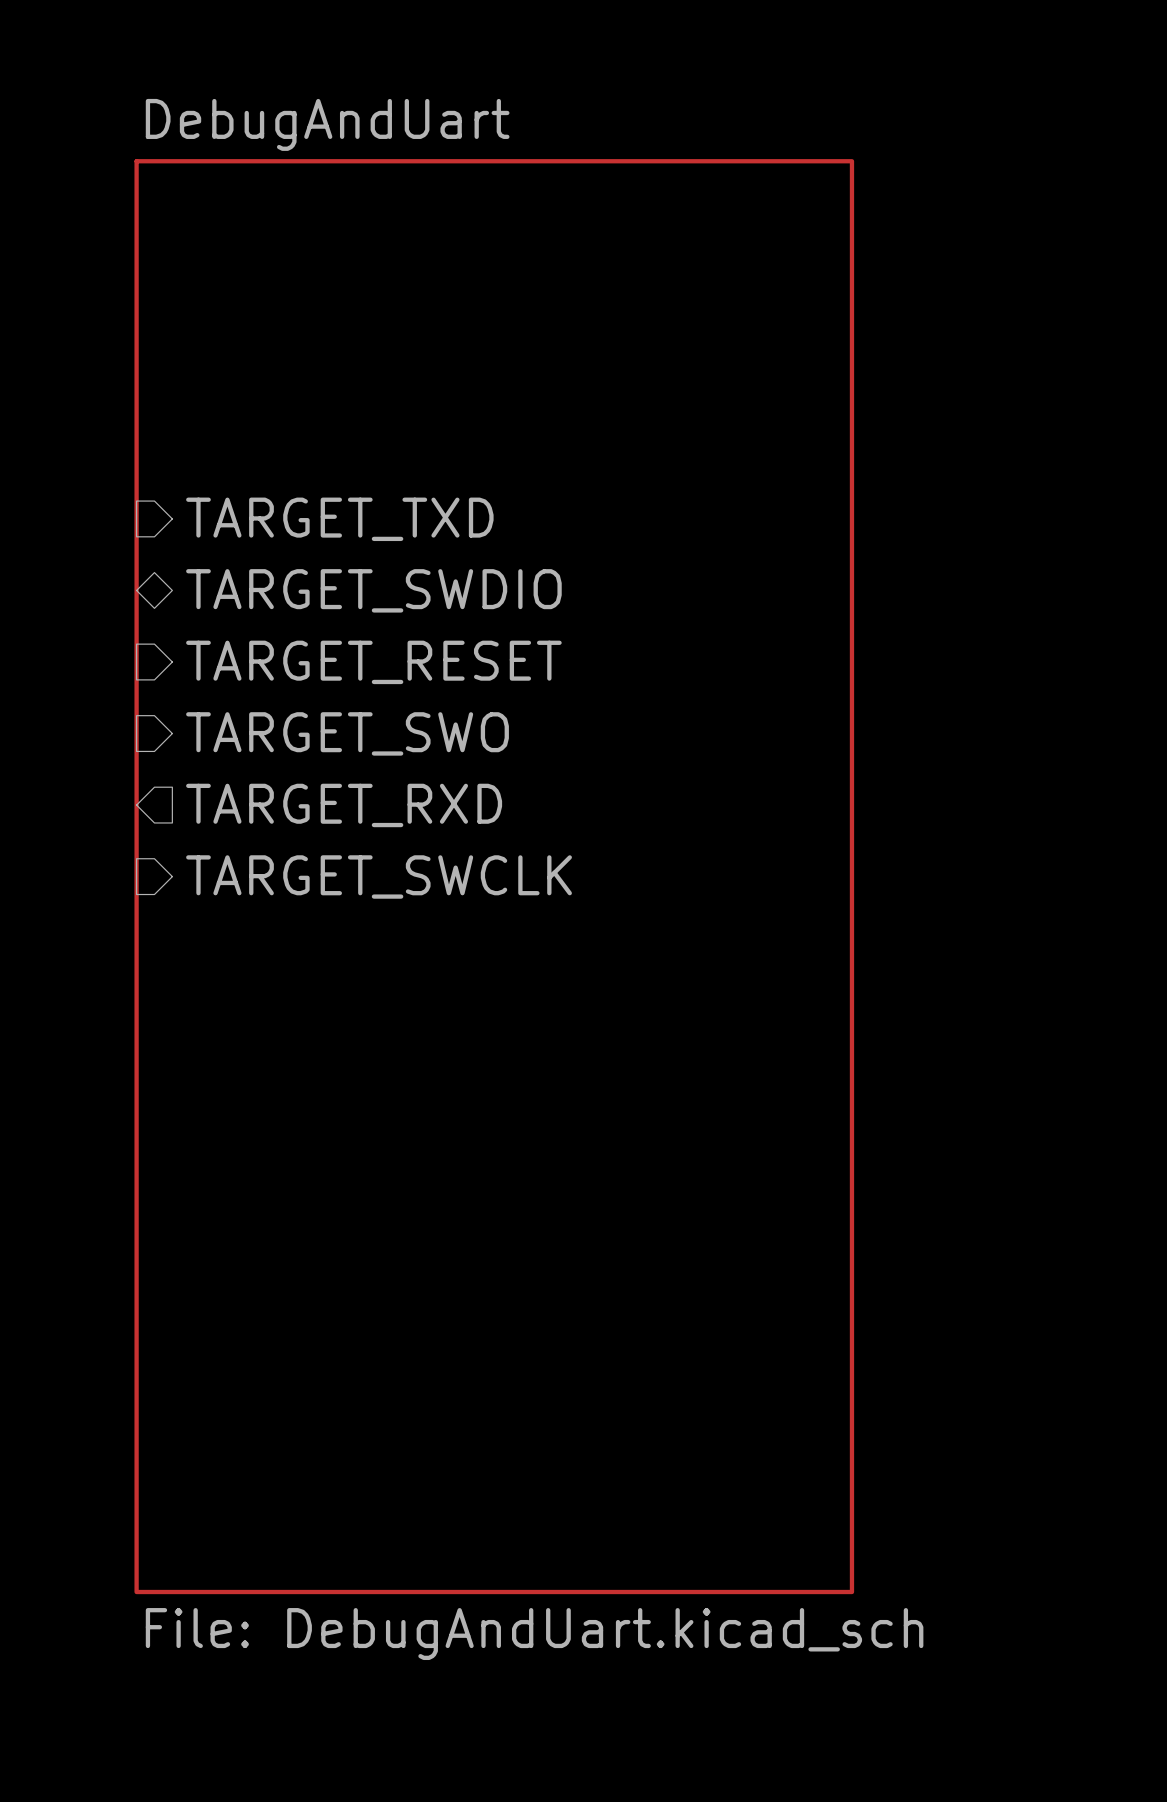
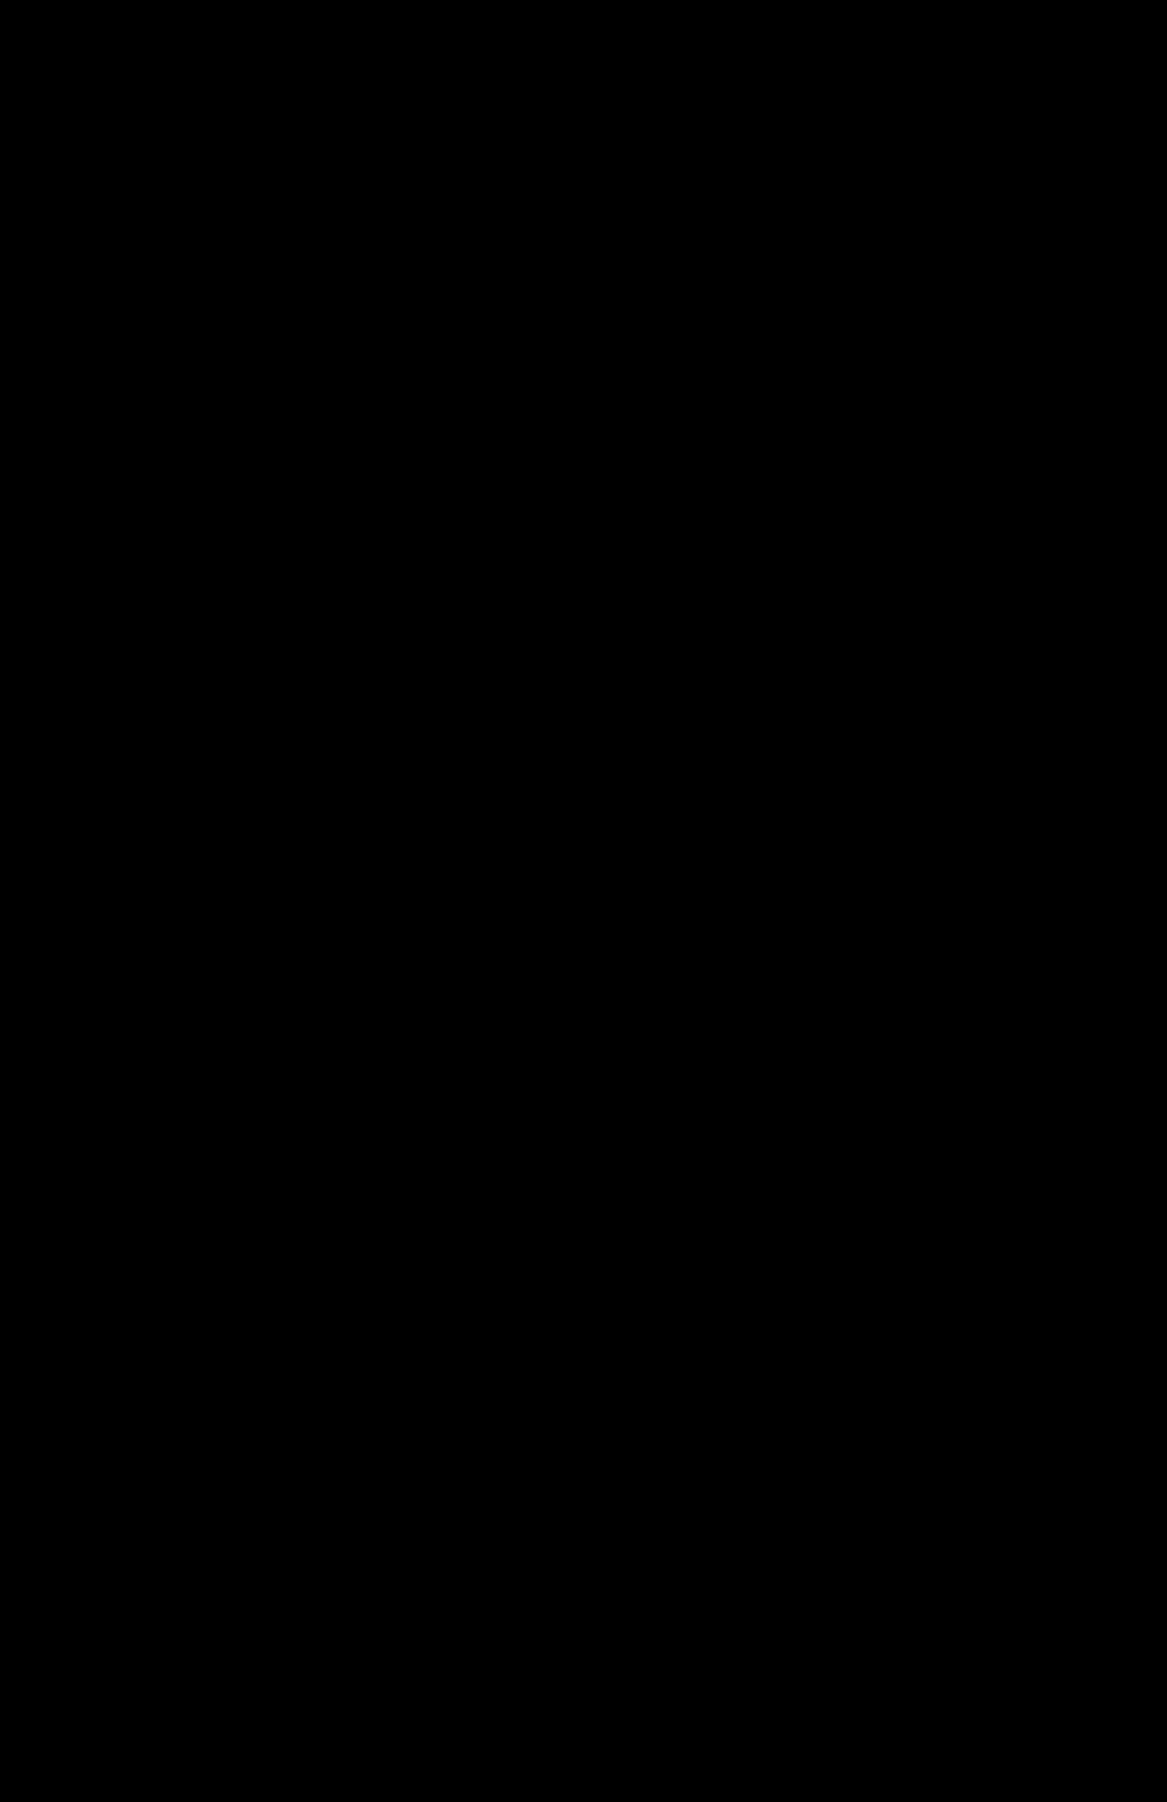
sheet pin: TARGET_TXD (339, 519) -> none
sheet pin: TARGET_SWDIO (373, 590) -> none
sheet pin: TARGET_RESET (373, 662) -> none
sheet pin: TARGET_SWO (347, 733) -> none
sheet pin: TARGET_RXD (344, 805) -> none
sheet pin: TARGET_SWCLK (379, 876) -> none
sheet DebugAndUart: File: DebugAndUart.kicad_sch (494, 876) -> none

